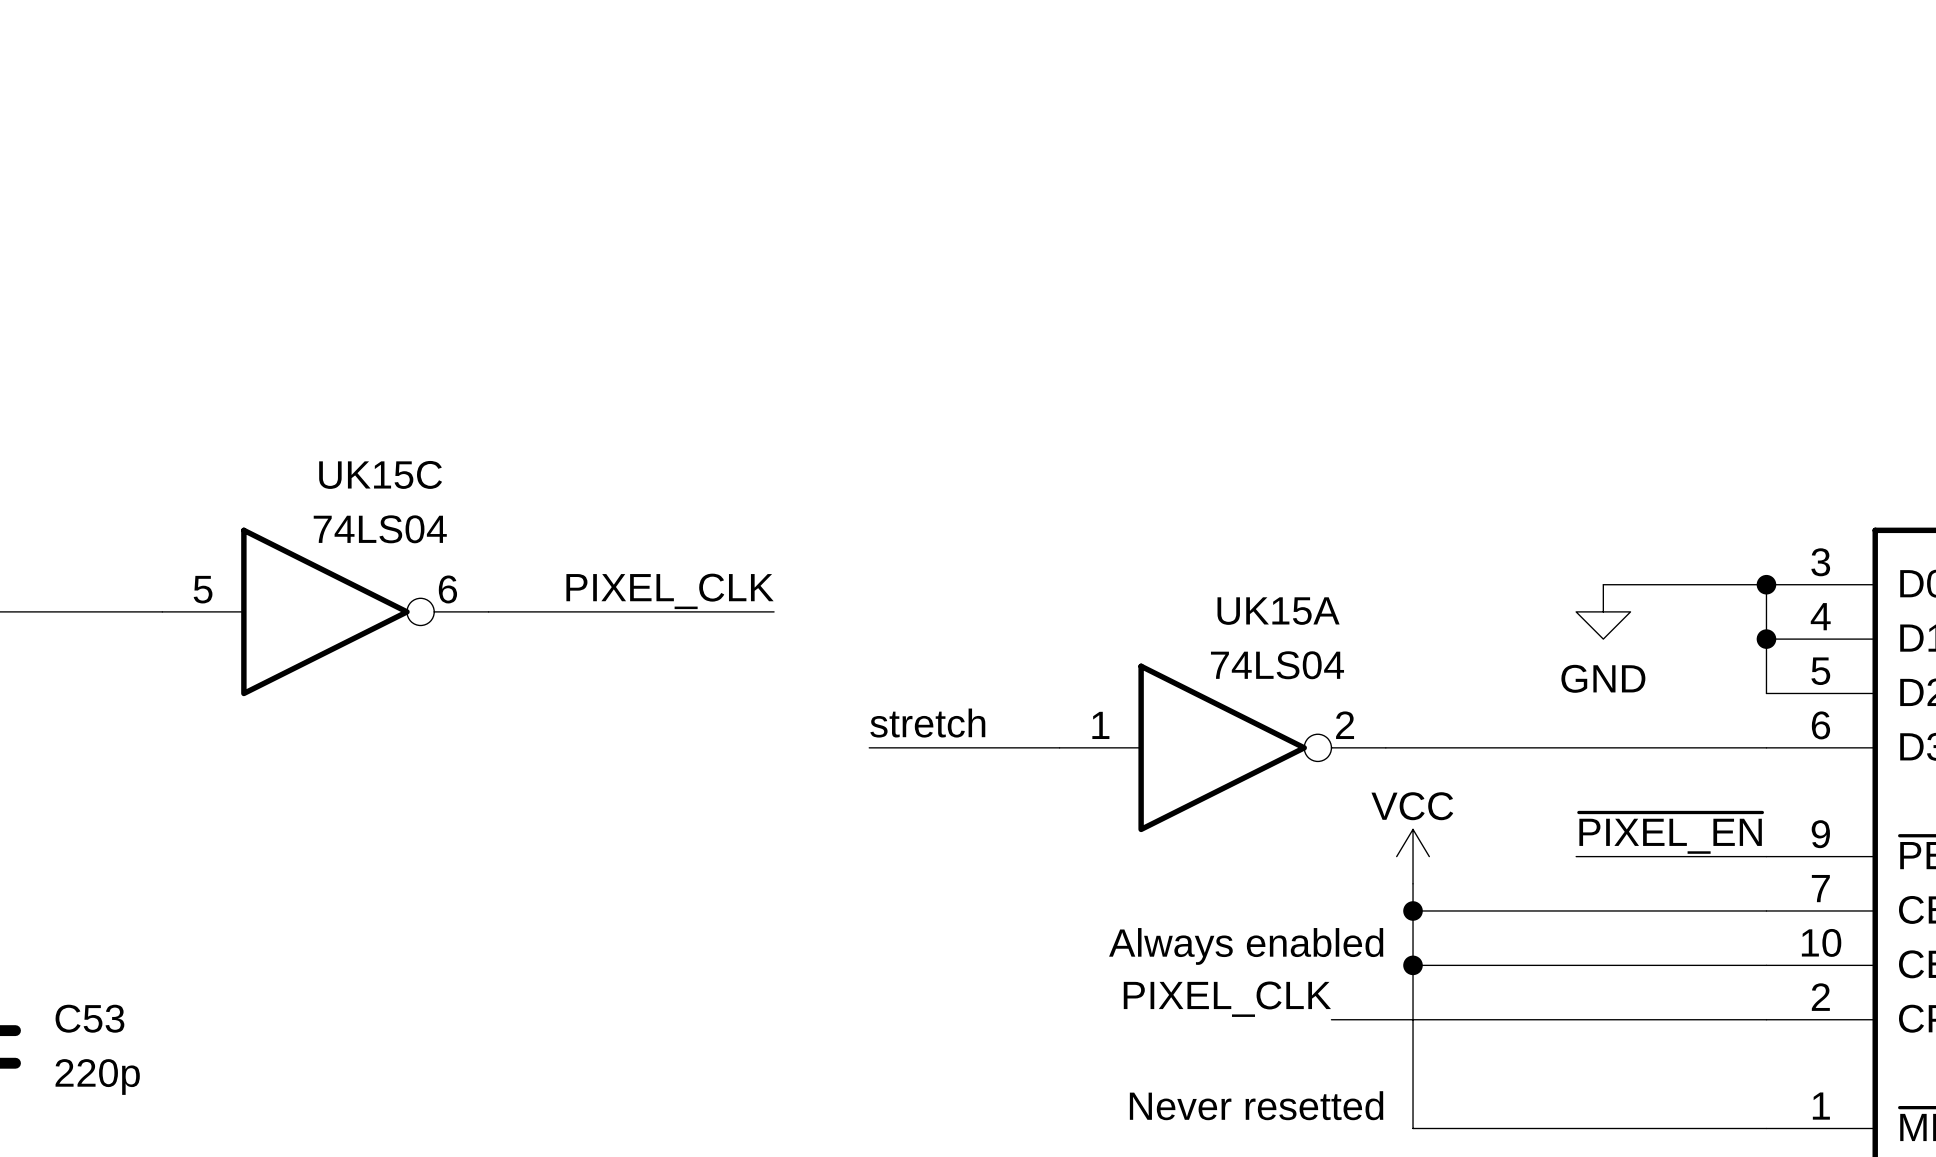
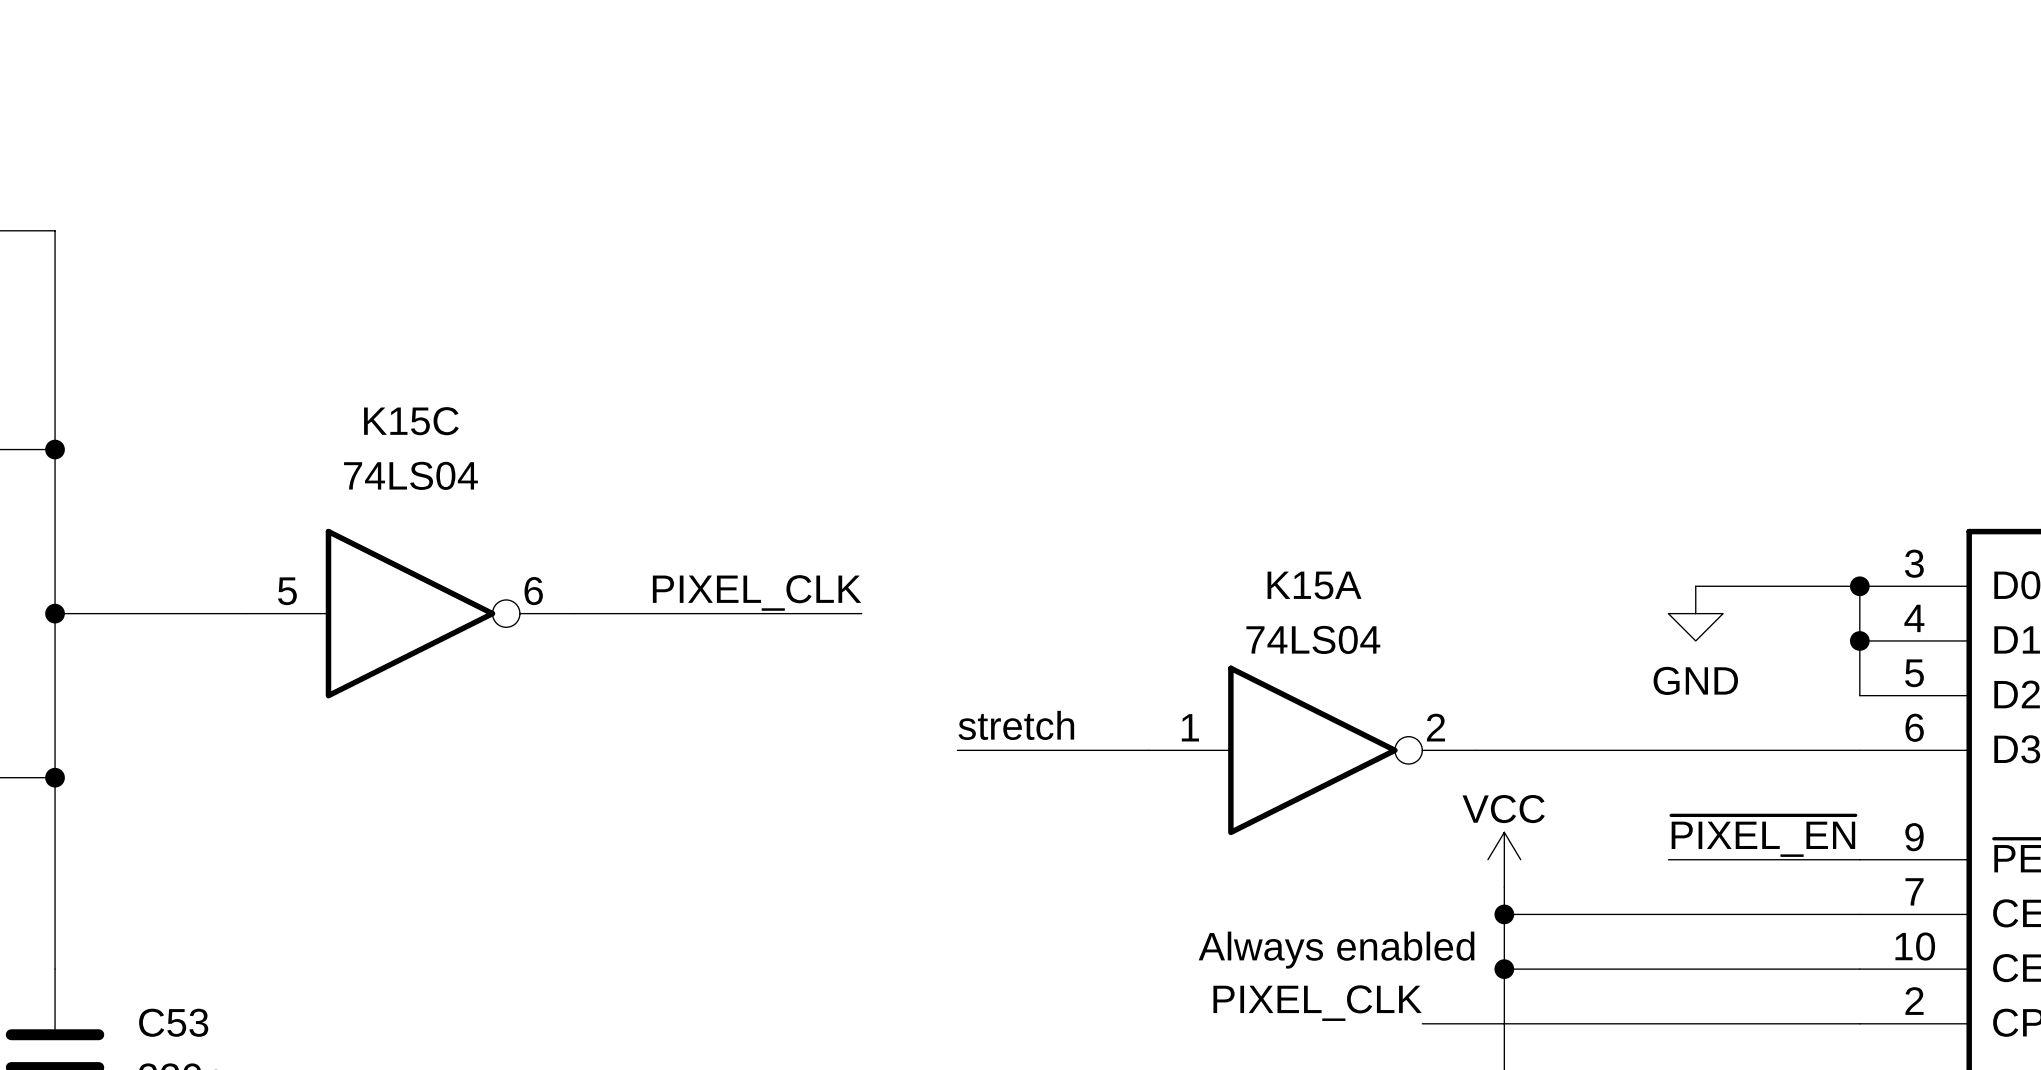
UK15C name: UK15C (380, 474) -> K15C (411, 421)
UK15C value position: 74LS04 (380, 529) -> 74LS04 (410, 475)
UK15A name: UK15A (1278, 611) -> K15A (1314, 585)
UK15A value position: 74LS04 (1277, 665) -> 74LS04 (1313, 639)

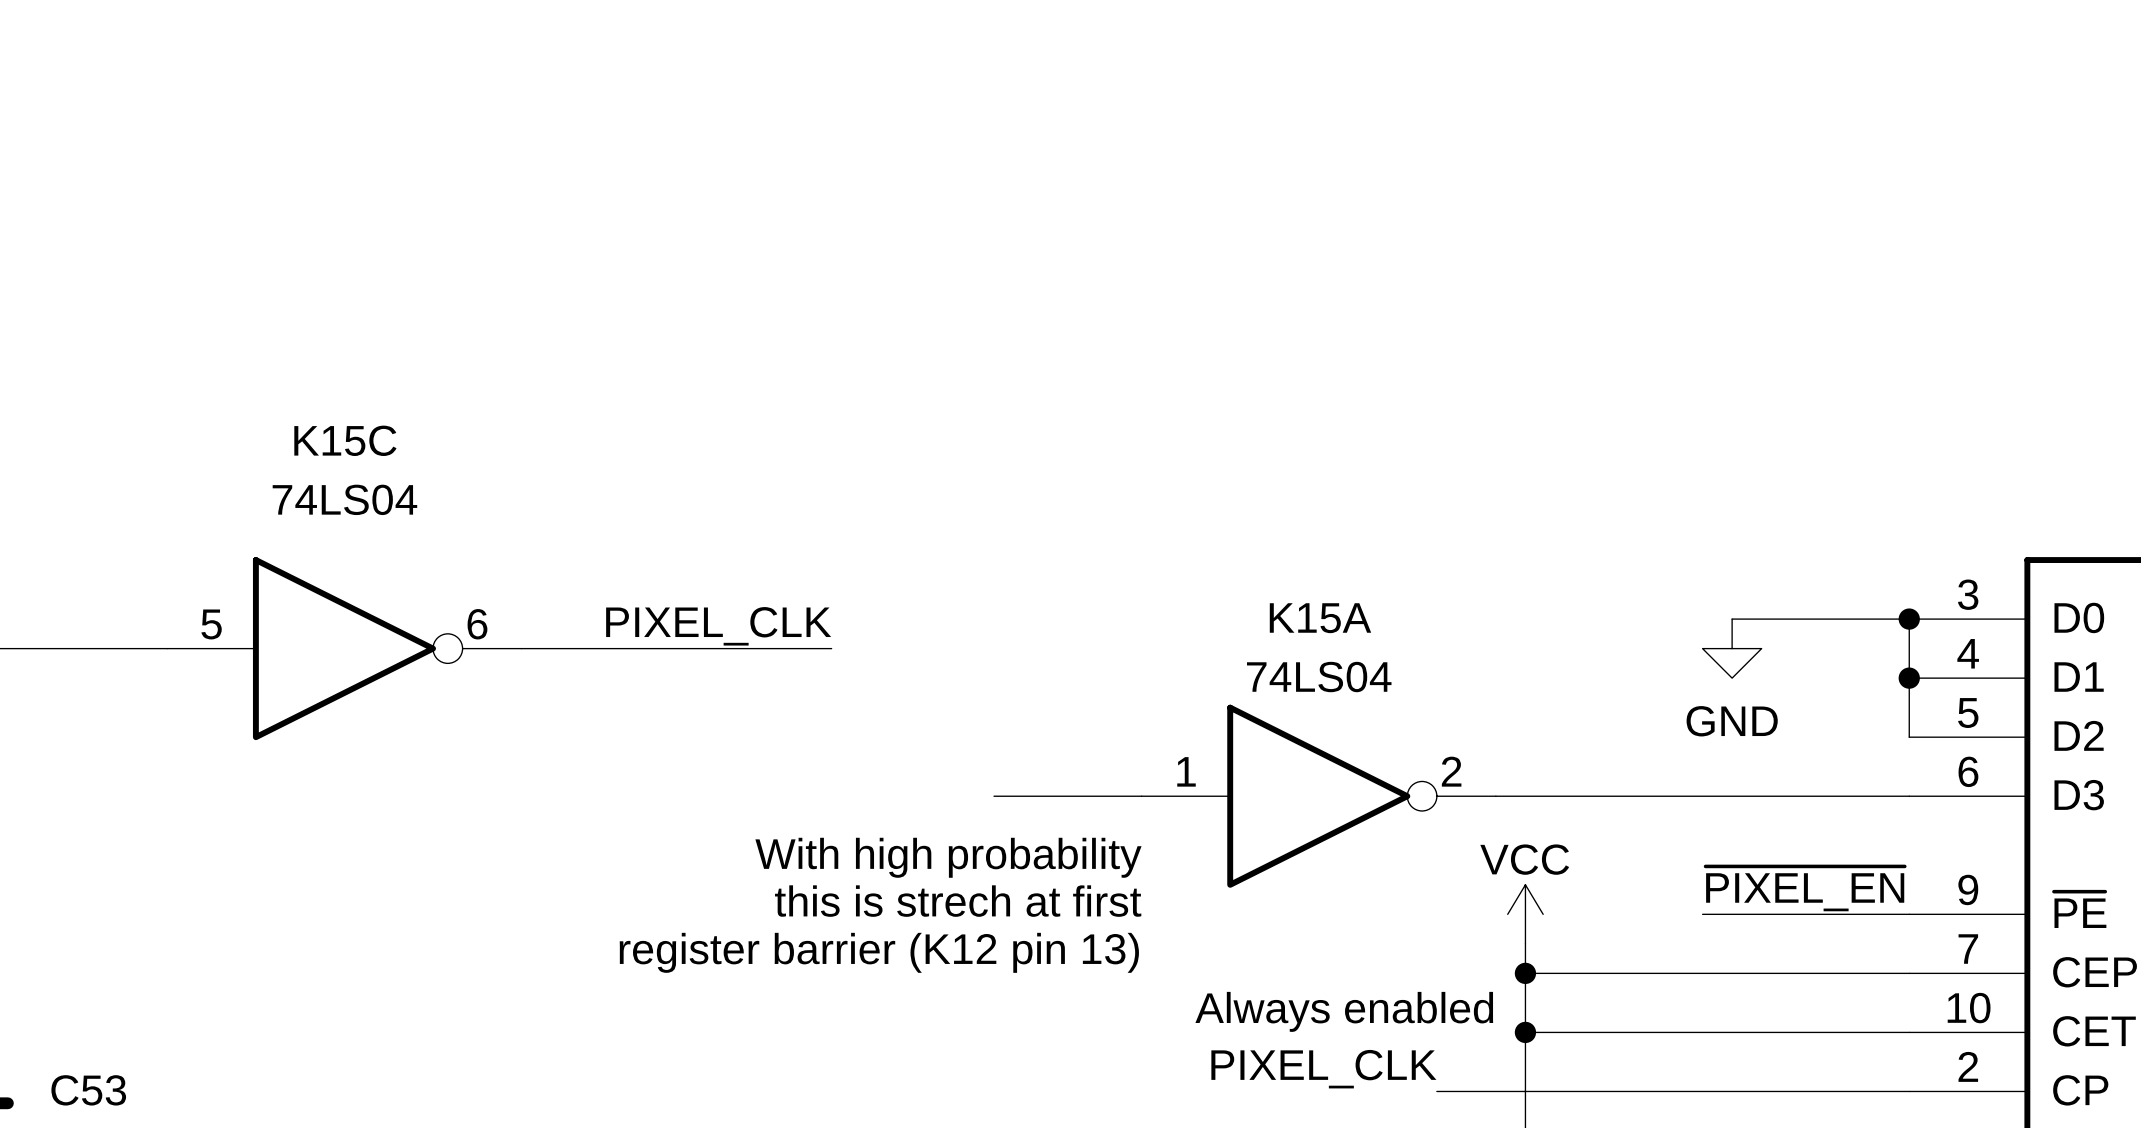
label: stretch (1016, 725) -> none
wire: (957, 750) (1012, 750) -> none
text: none -> With high probability (948, 857)
text: none -> this is strech at first (958, 901)
text: none -> register barrier (K12 pin 13) (879, 952)

